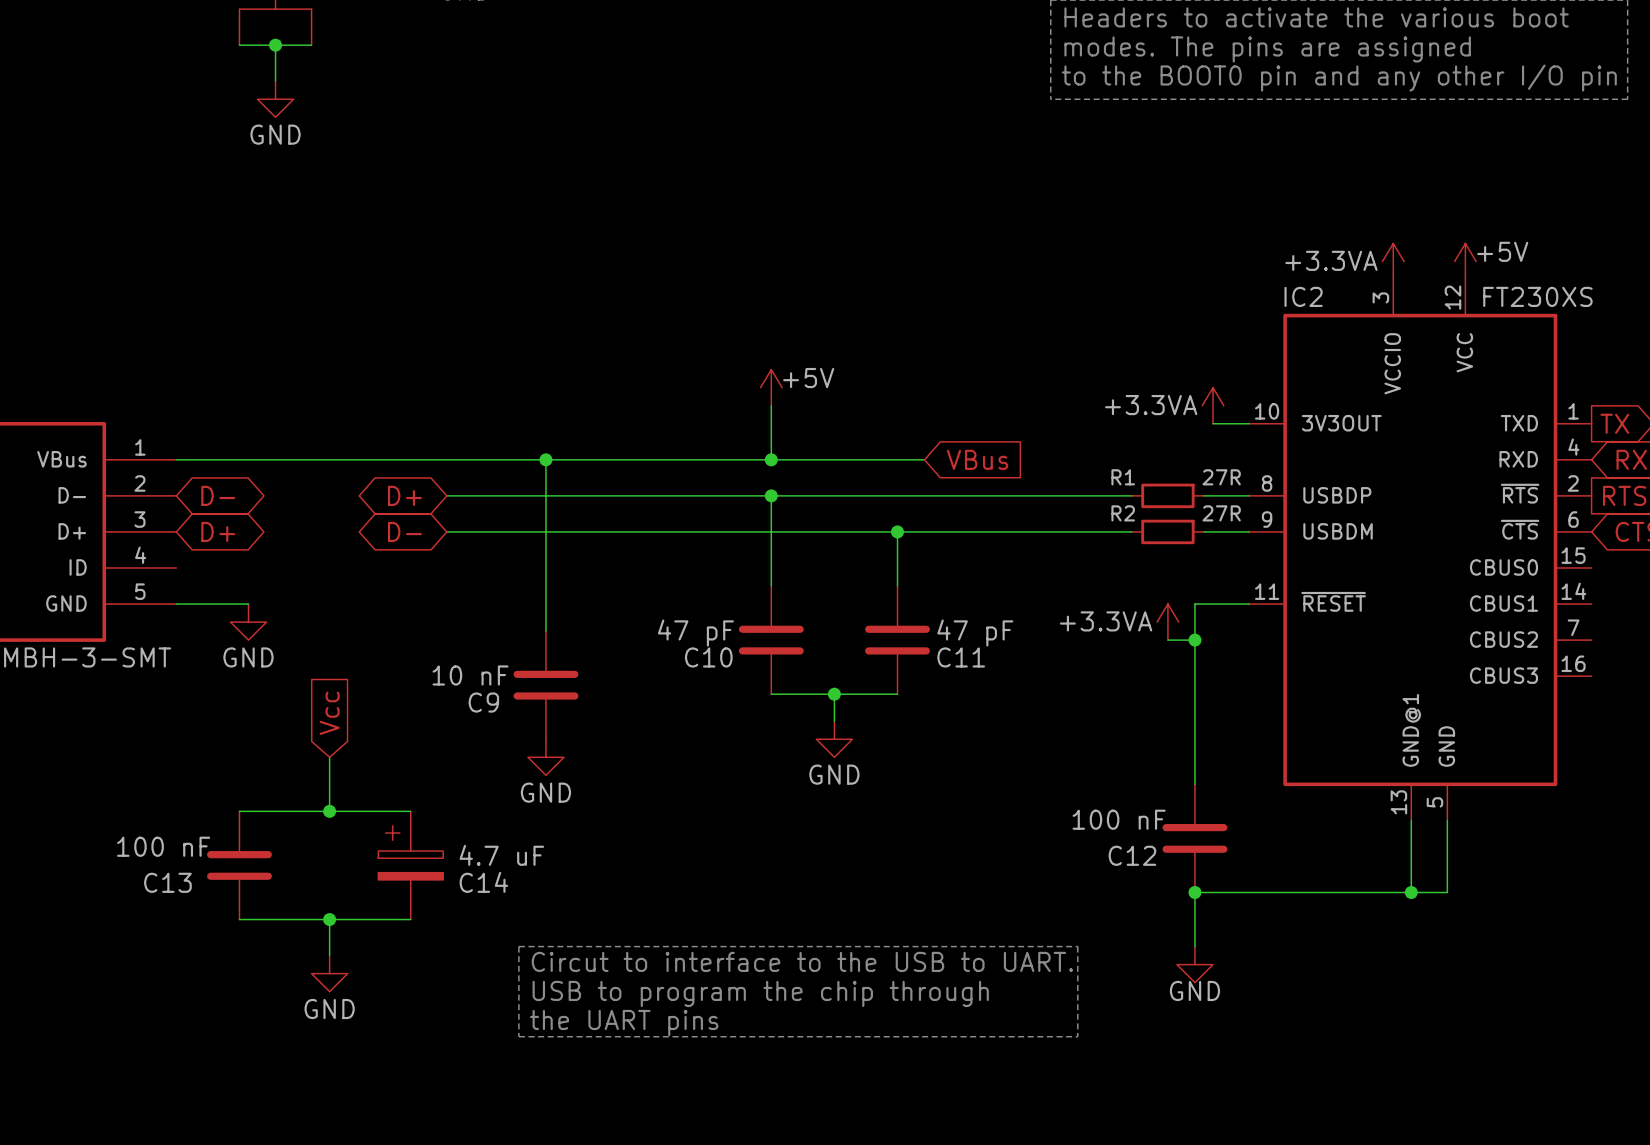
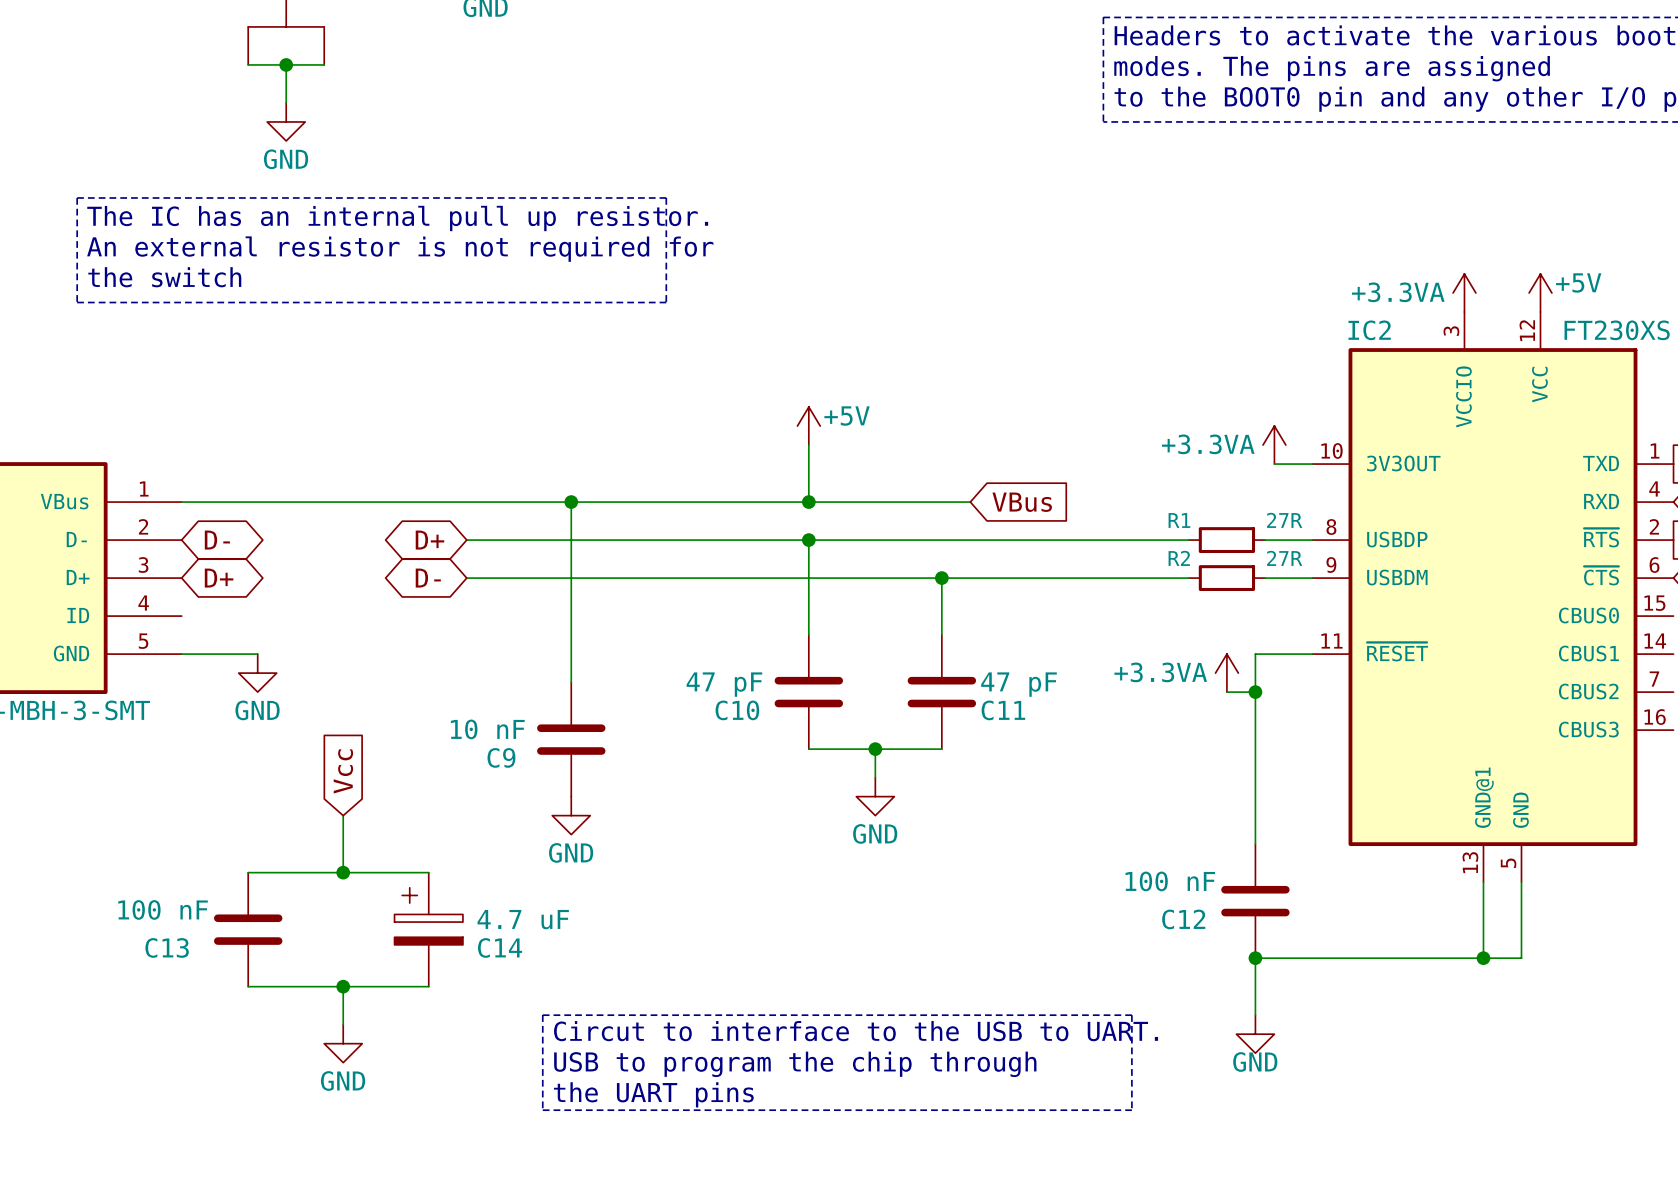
line: none -> (77, 197) (666, 197) (666, 302) (77, 302) (77, 197)
text: none -> The IC has an internal pull up resistor. (397, 218)
text: none -> An external resistor is not required for (400, 249)
text: none -> the switch (164, 277)

